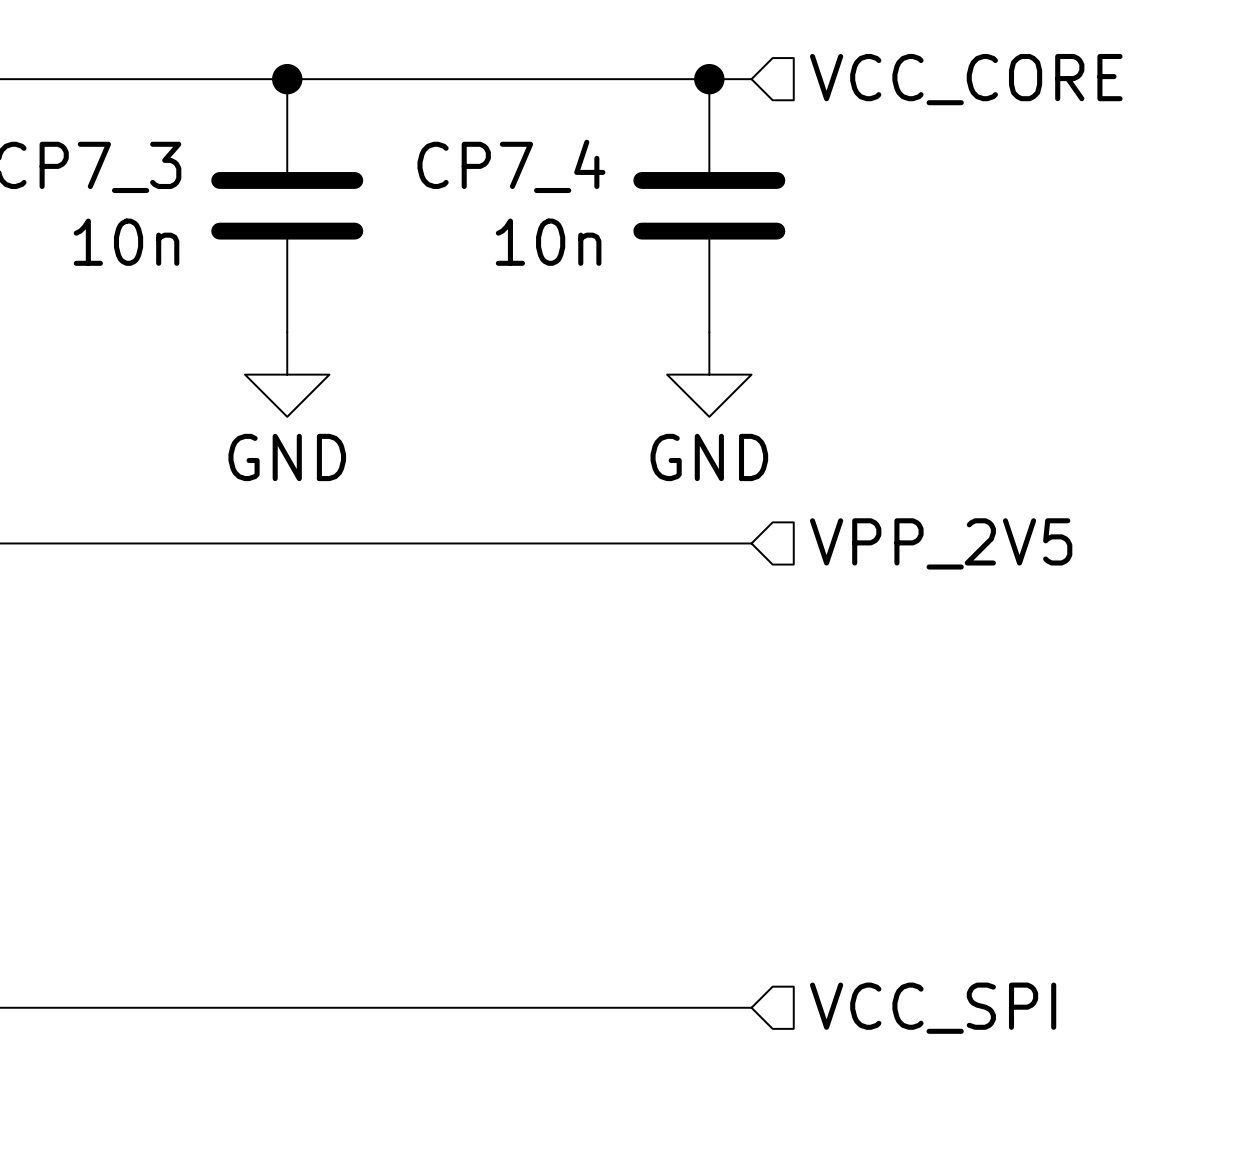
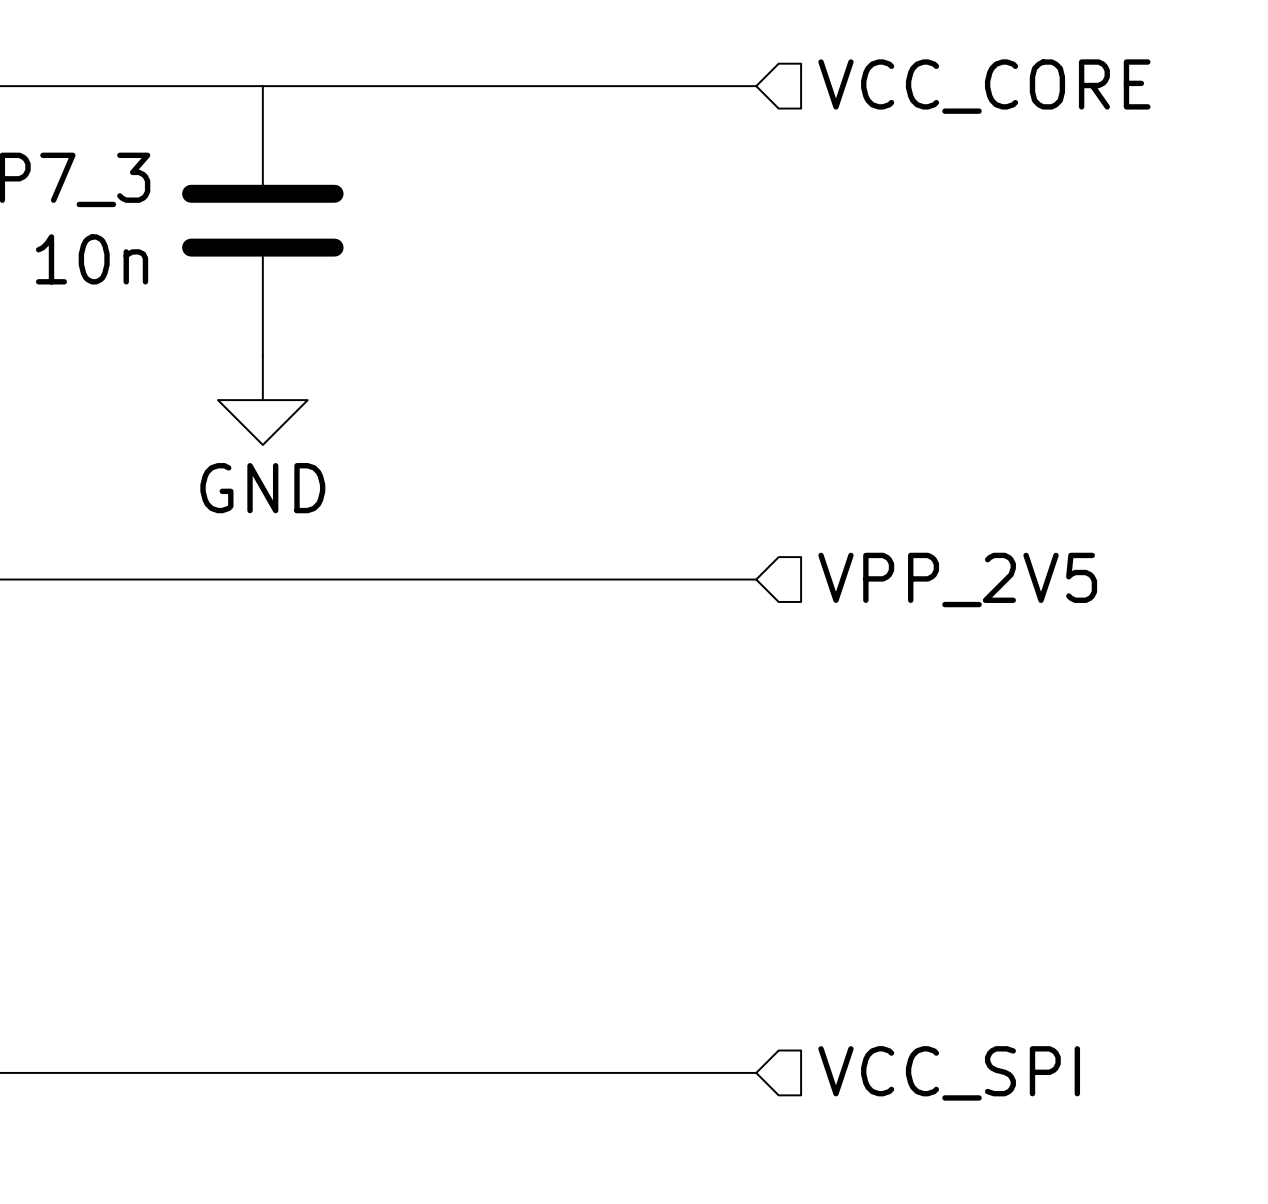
junction: (287, 79) -> none
junction: (709, 79) -> none
CP7_4: 10n (709, 205) -> none
power symbol: GND (709, 374) -> none

